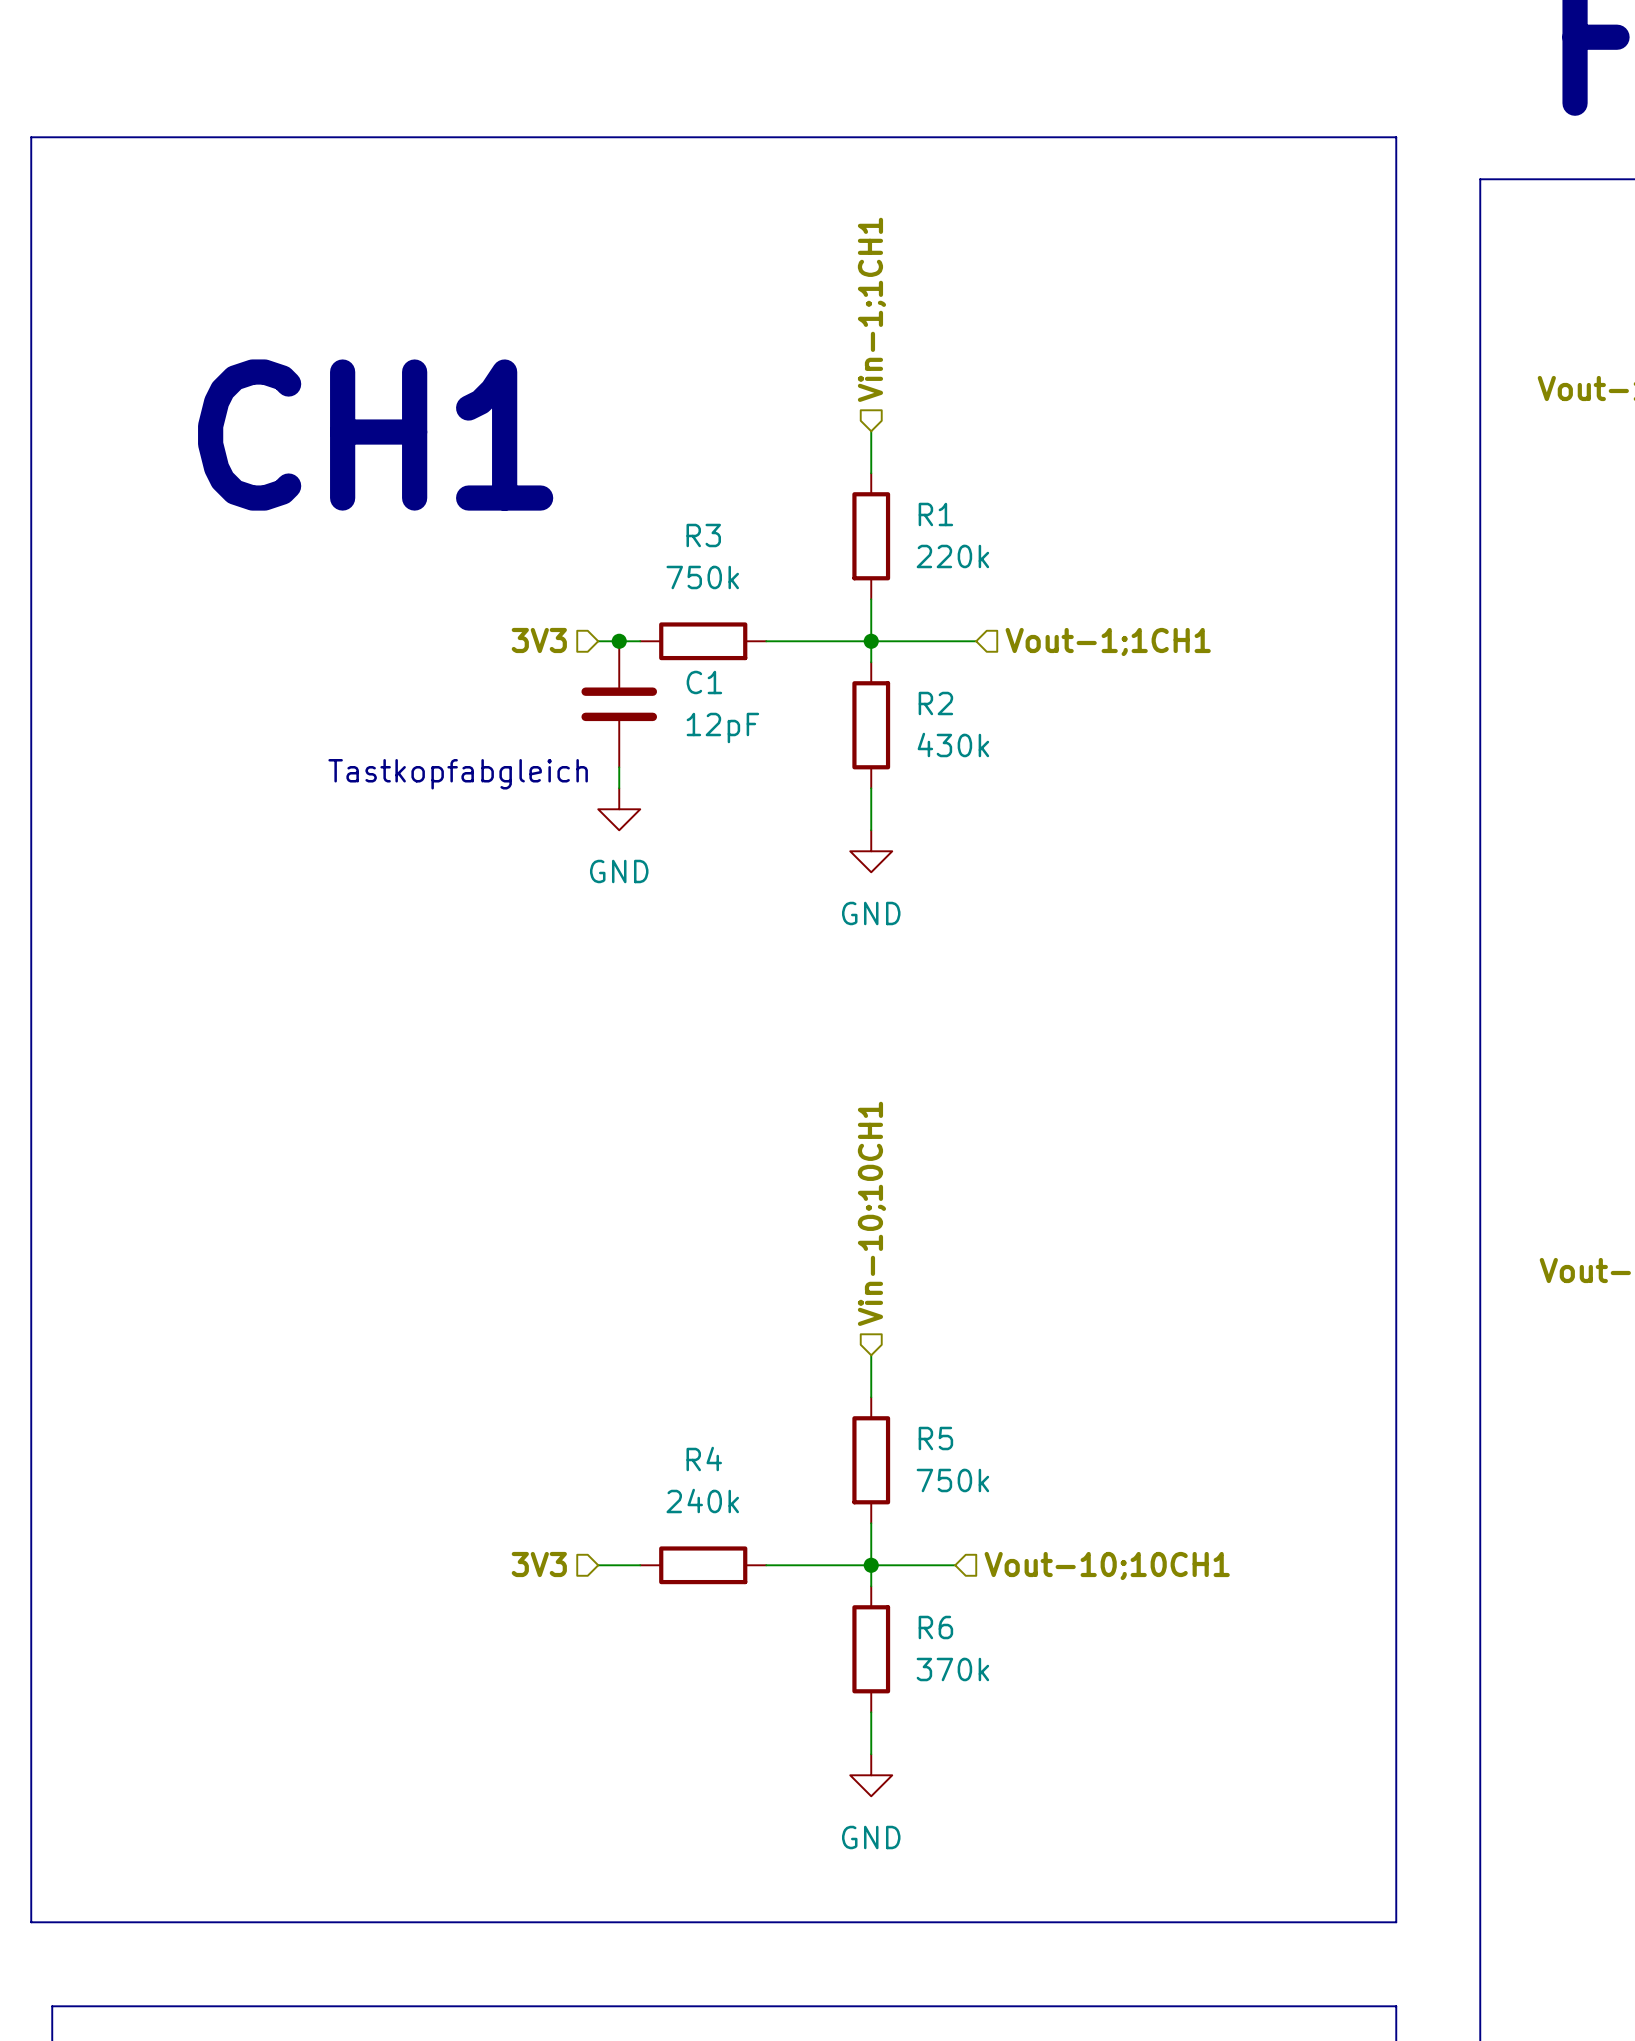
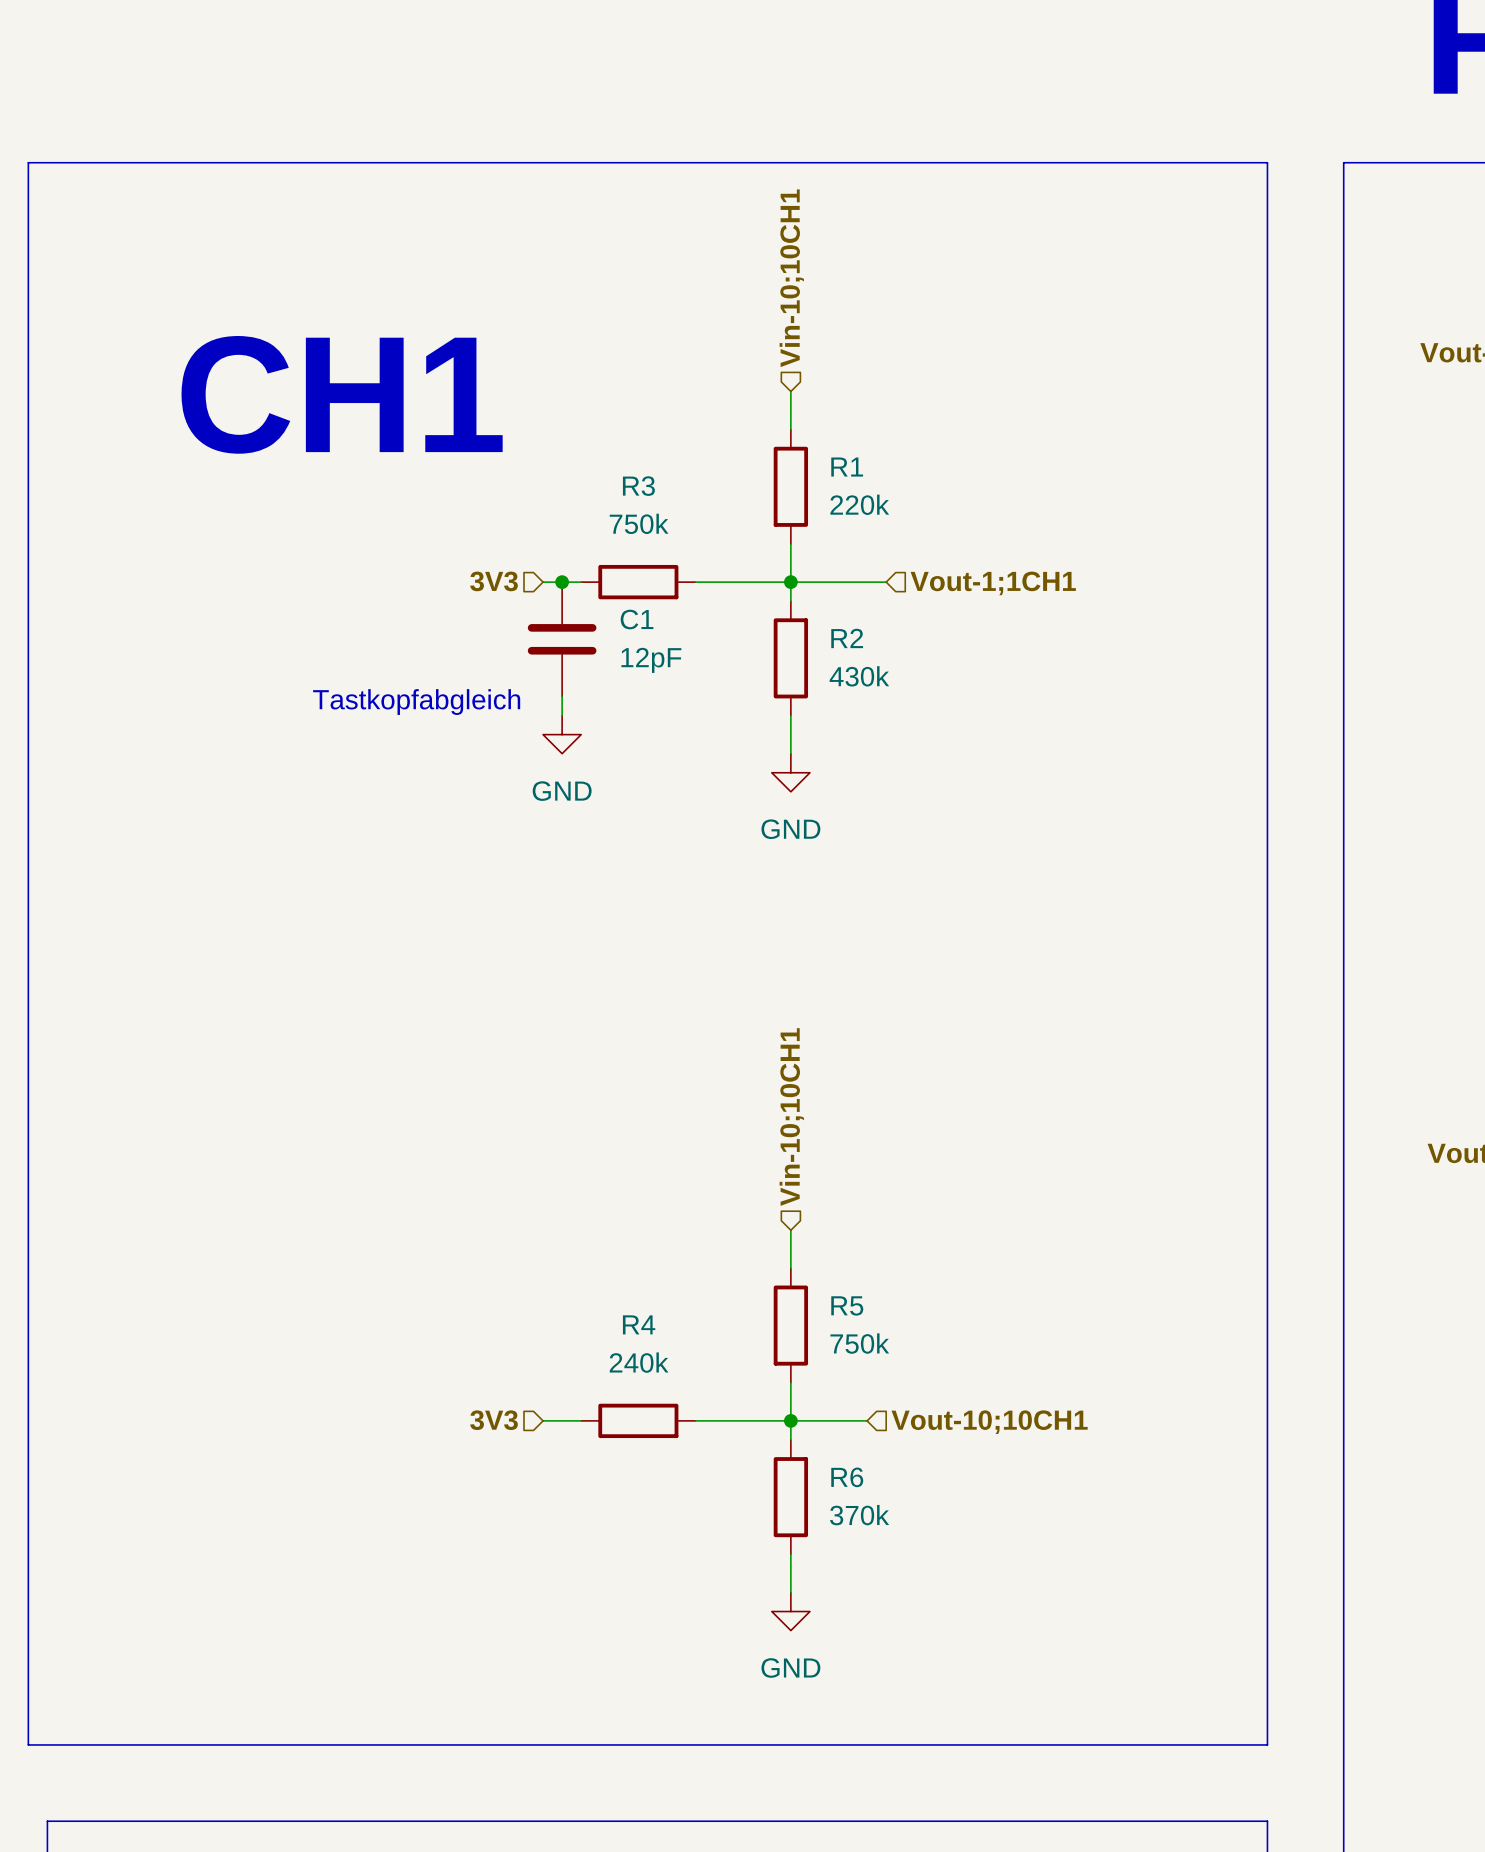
line: (31, 179) (31, 137) (1396, 137) (1396, 179) -> (28, 162) (1267, 162)
hierarchical label: Vin-1;1CH1 (871, 309) -> Vin-10;10CH1 (791, 278)

